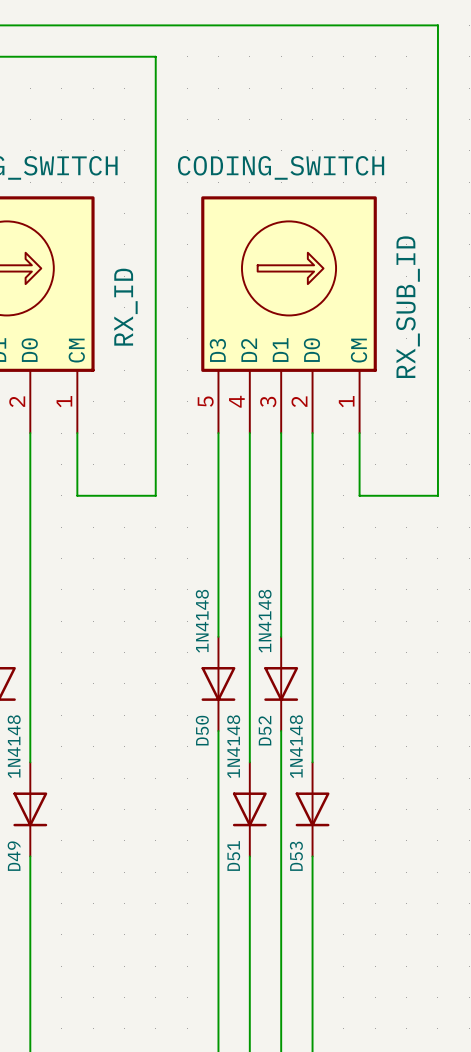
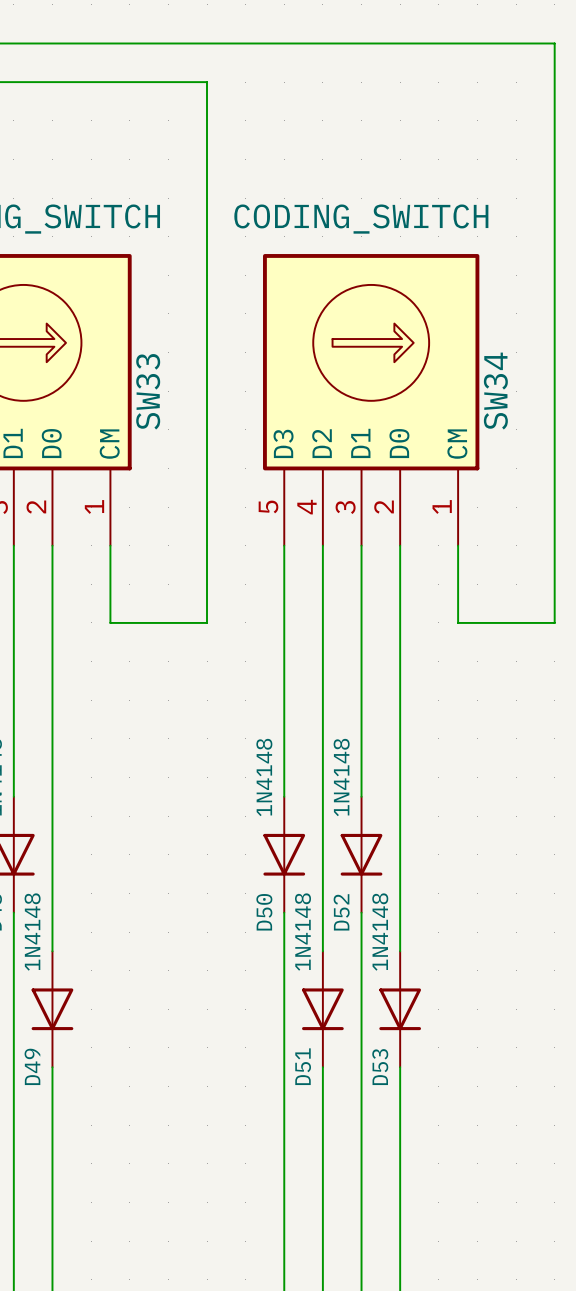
RX_ID name: RX_ID (125, 307) -> SW33 (148, 391)
RX_SUB_ID name: RX_SUB_ID (408, 307) -> SW34 (495, 391)

